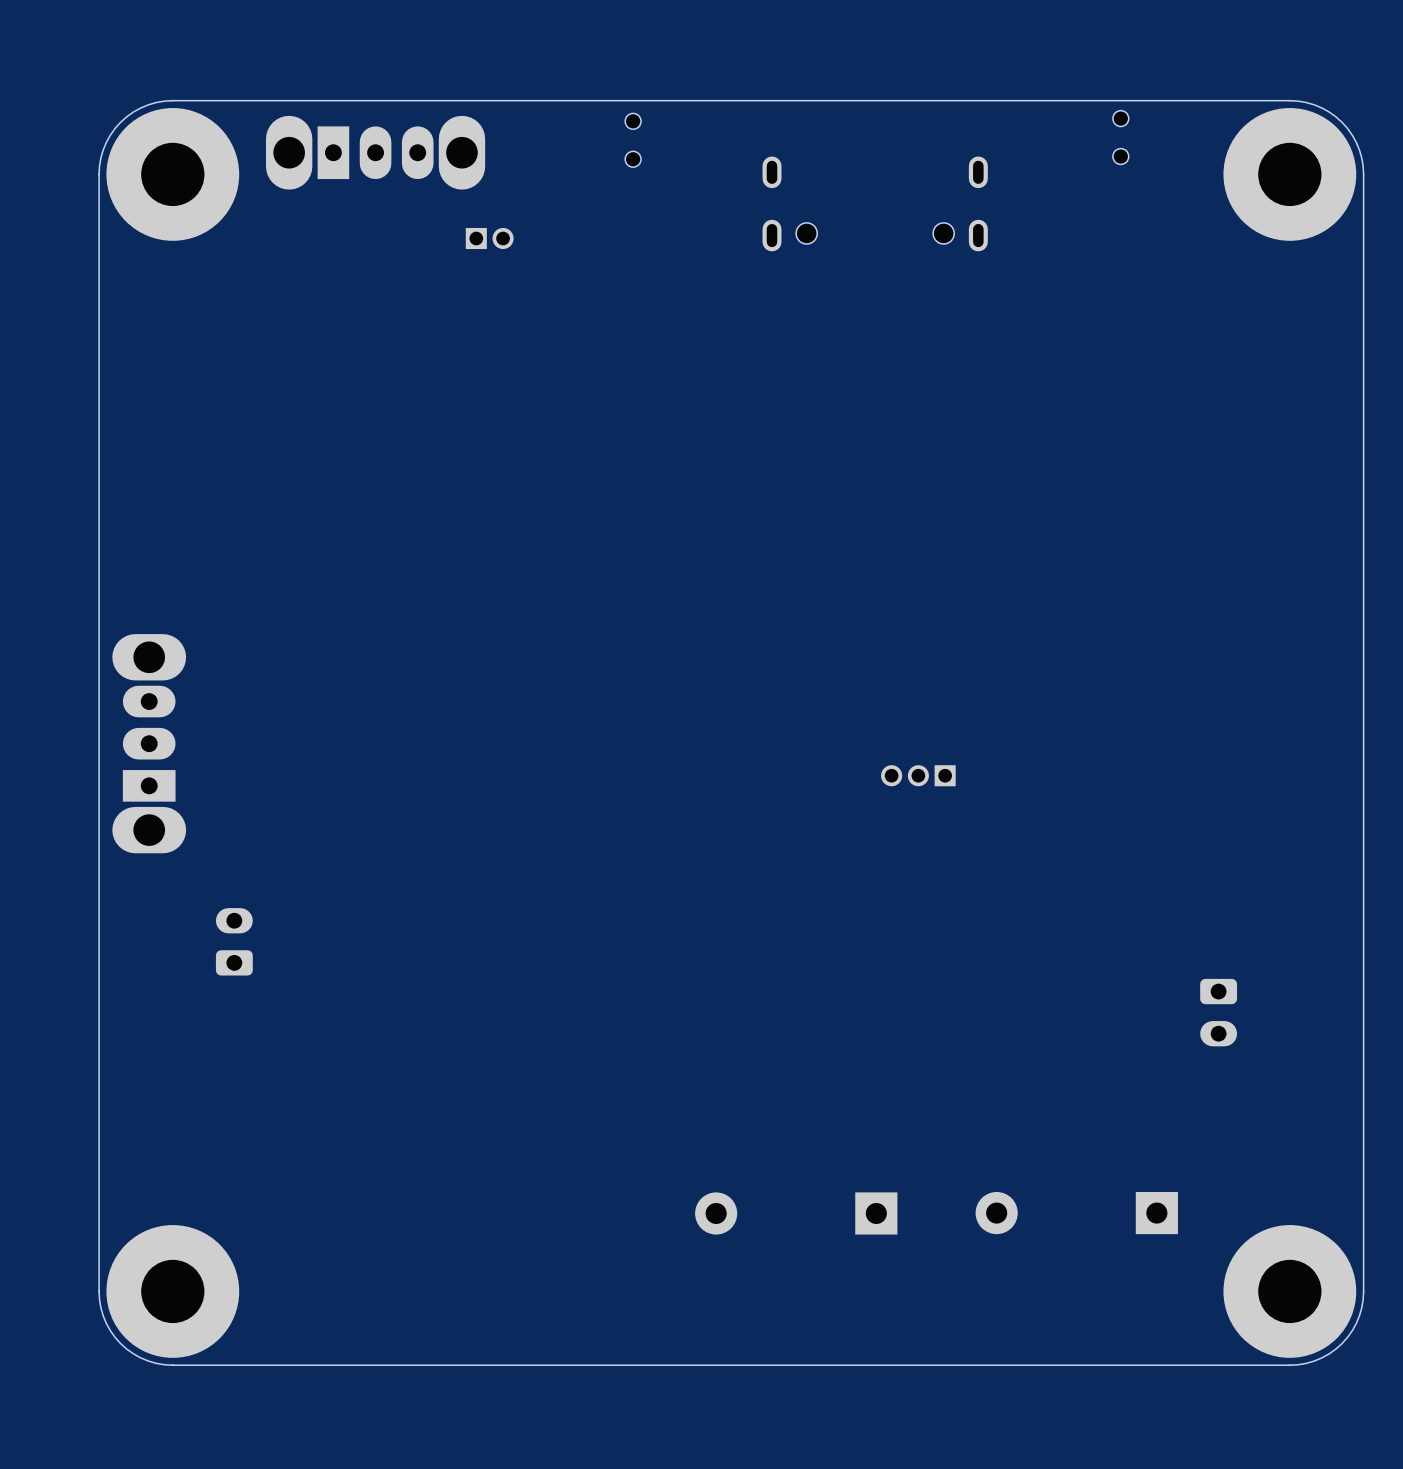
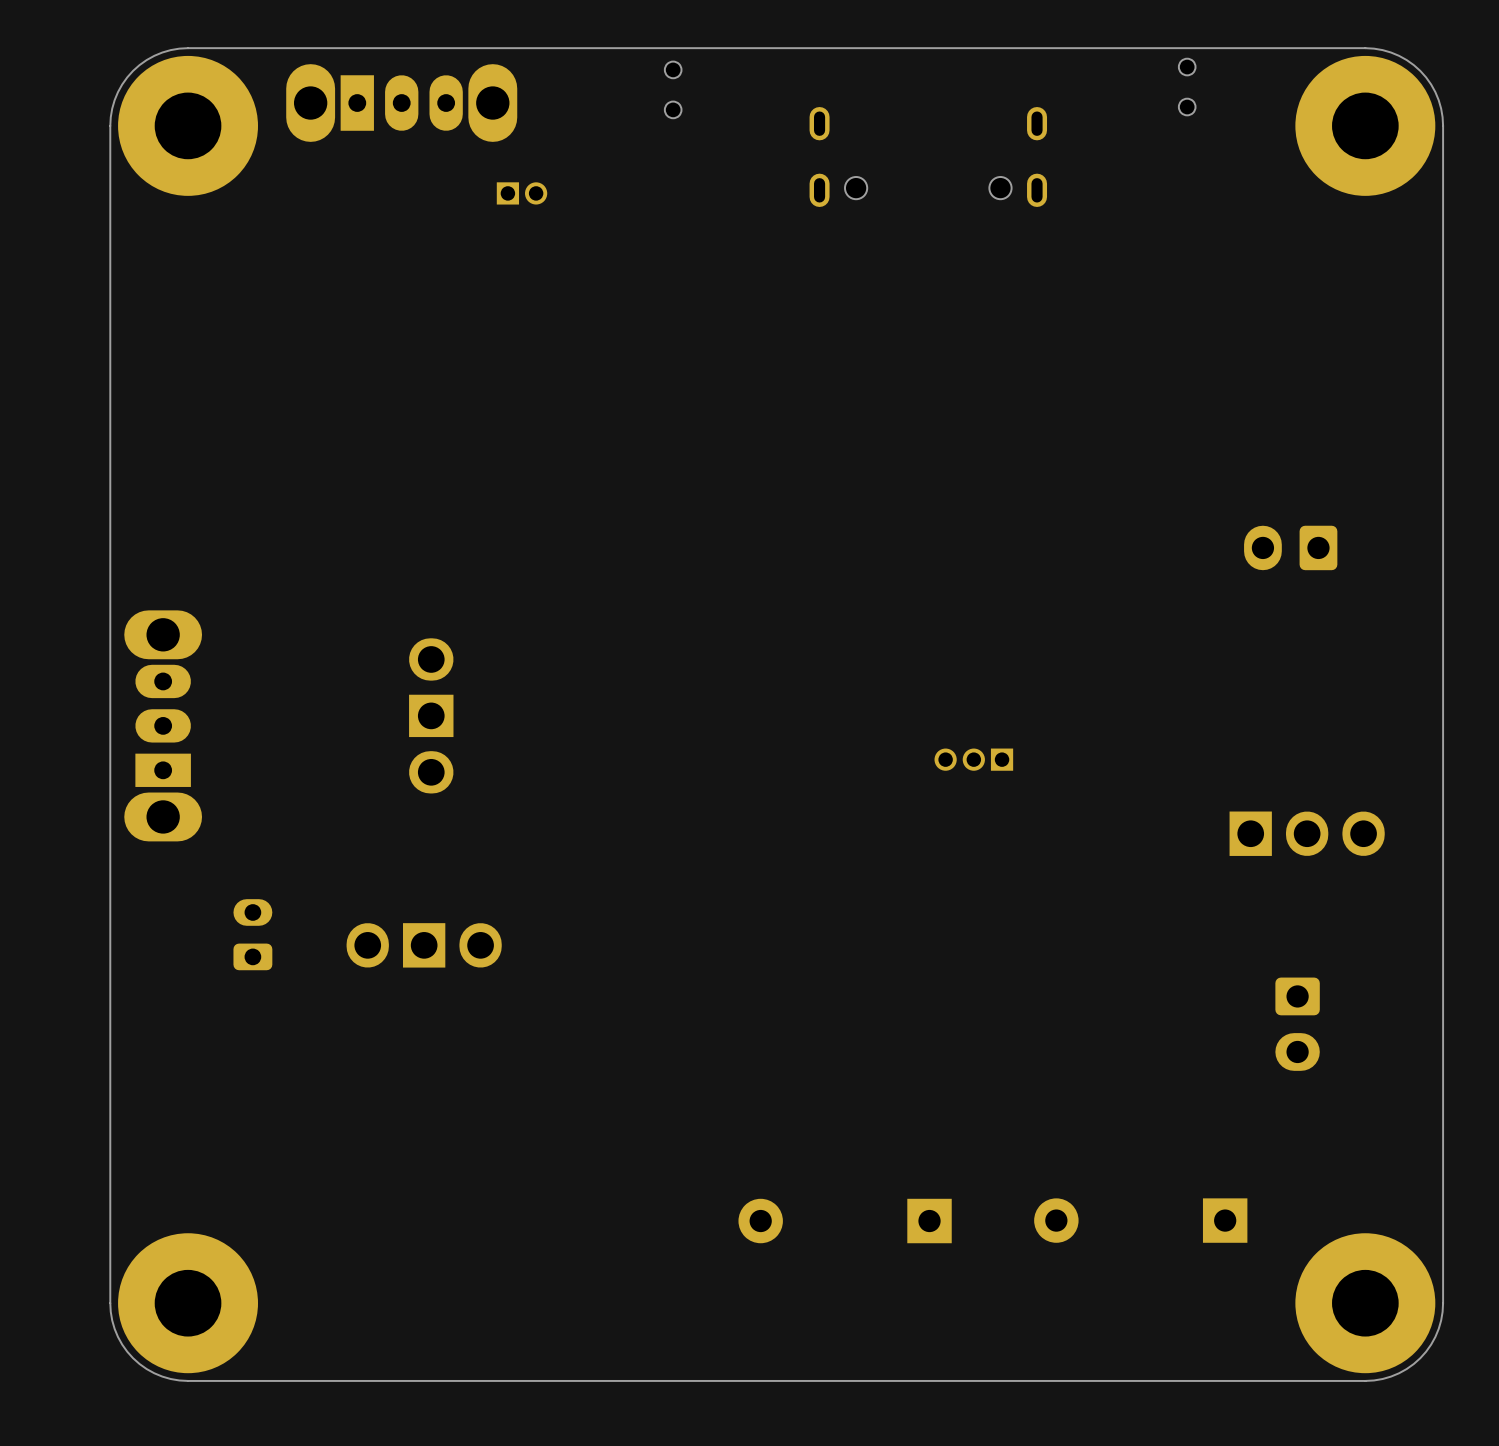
part: none -> (1290, 547)
part: none -> (431, 715)
part: none -> (1307, 833)
part: none -> (424, 945)
part footprint: [1200, 978, 1238, 1047] -> [1275, 977, 1320, 1071]

